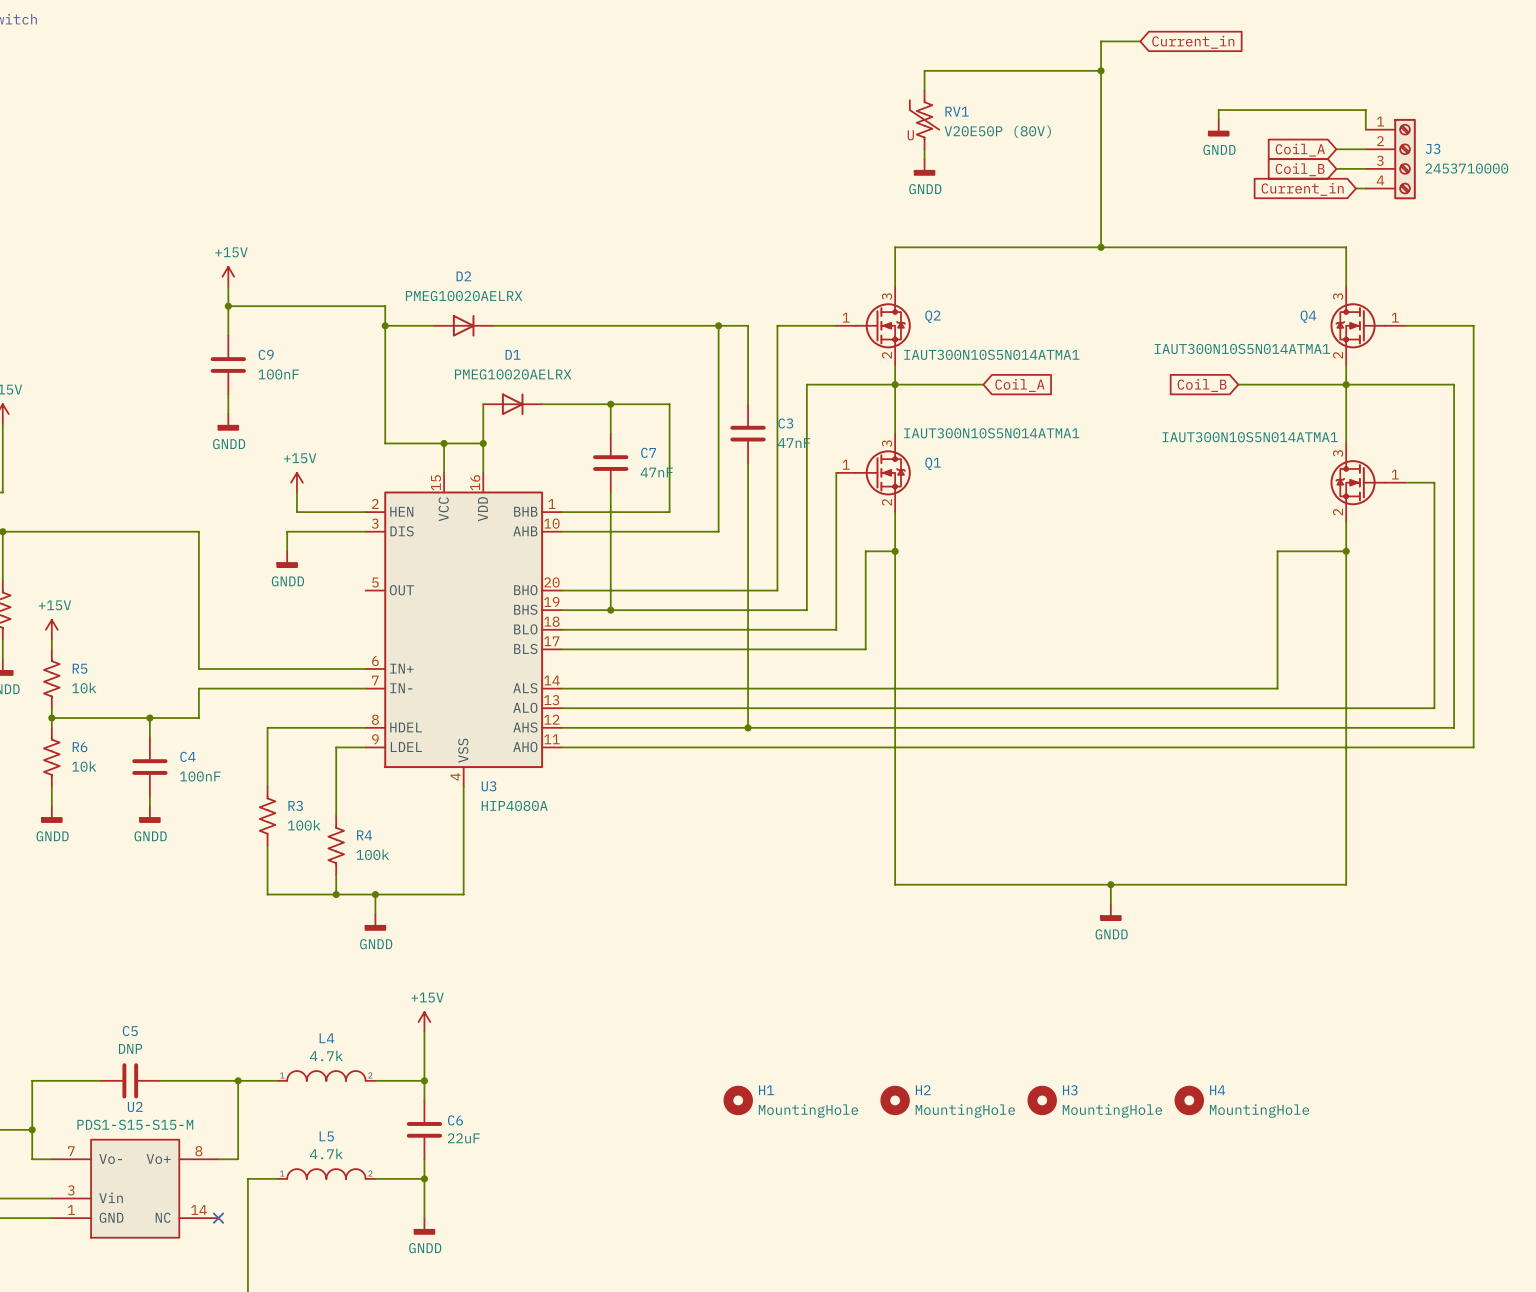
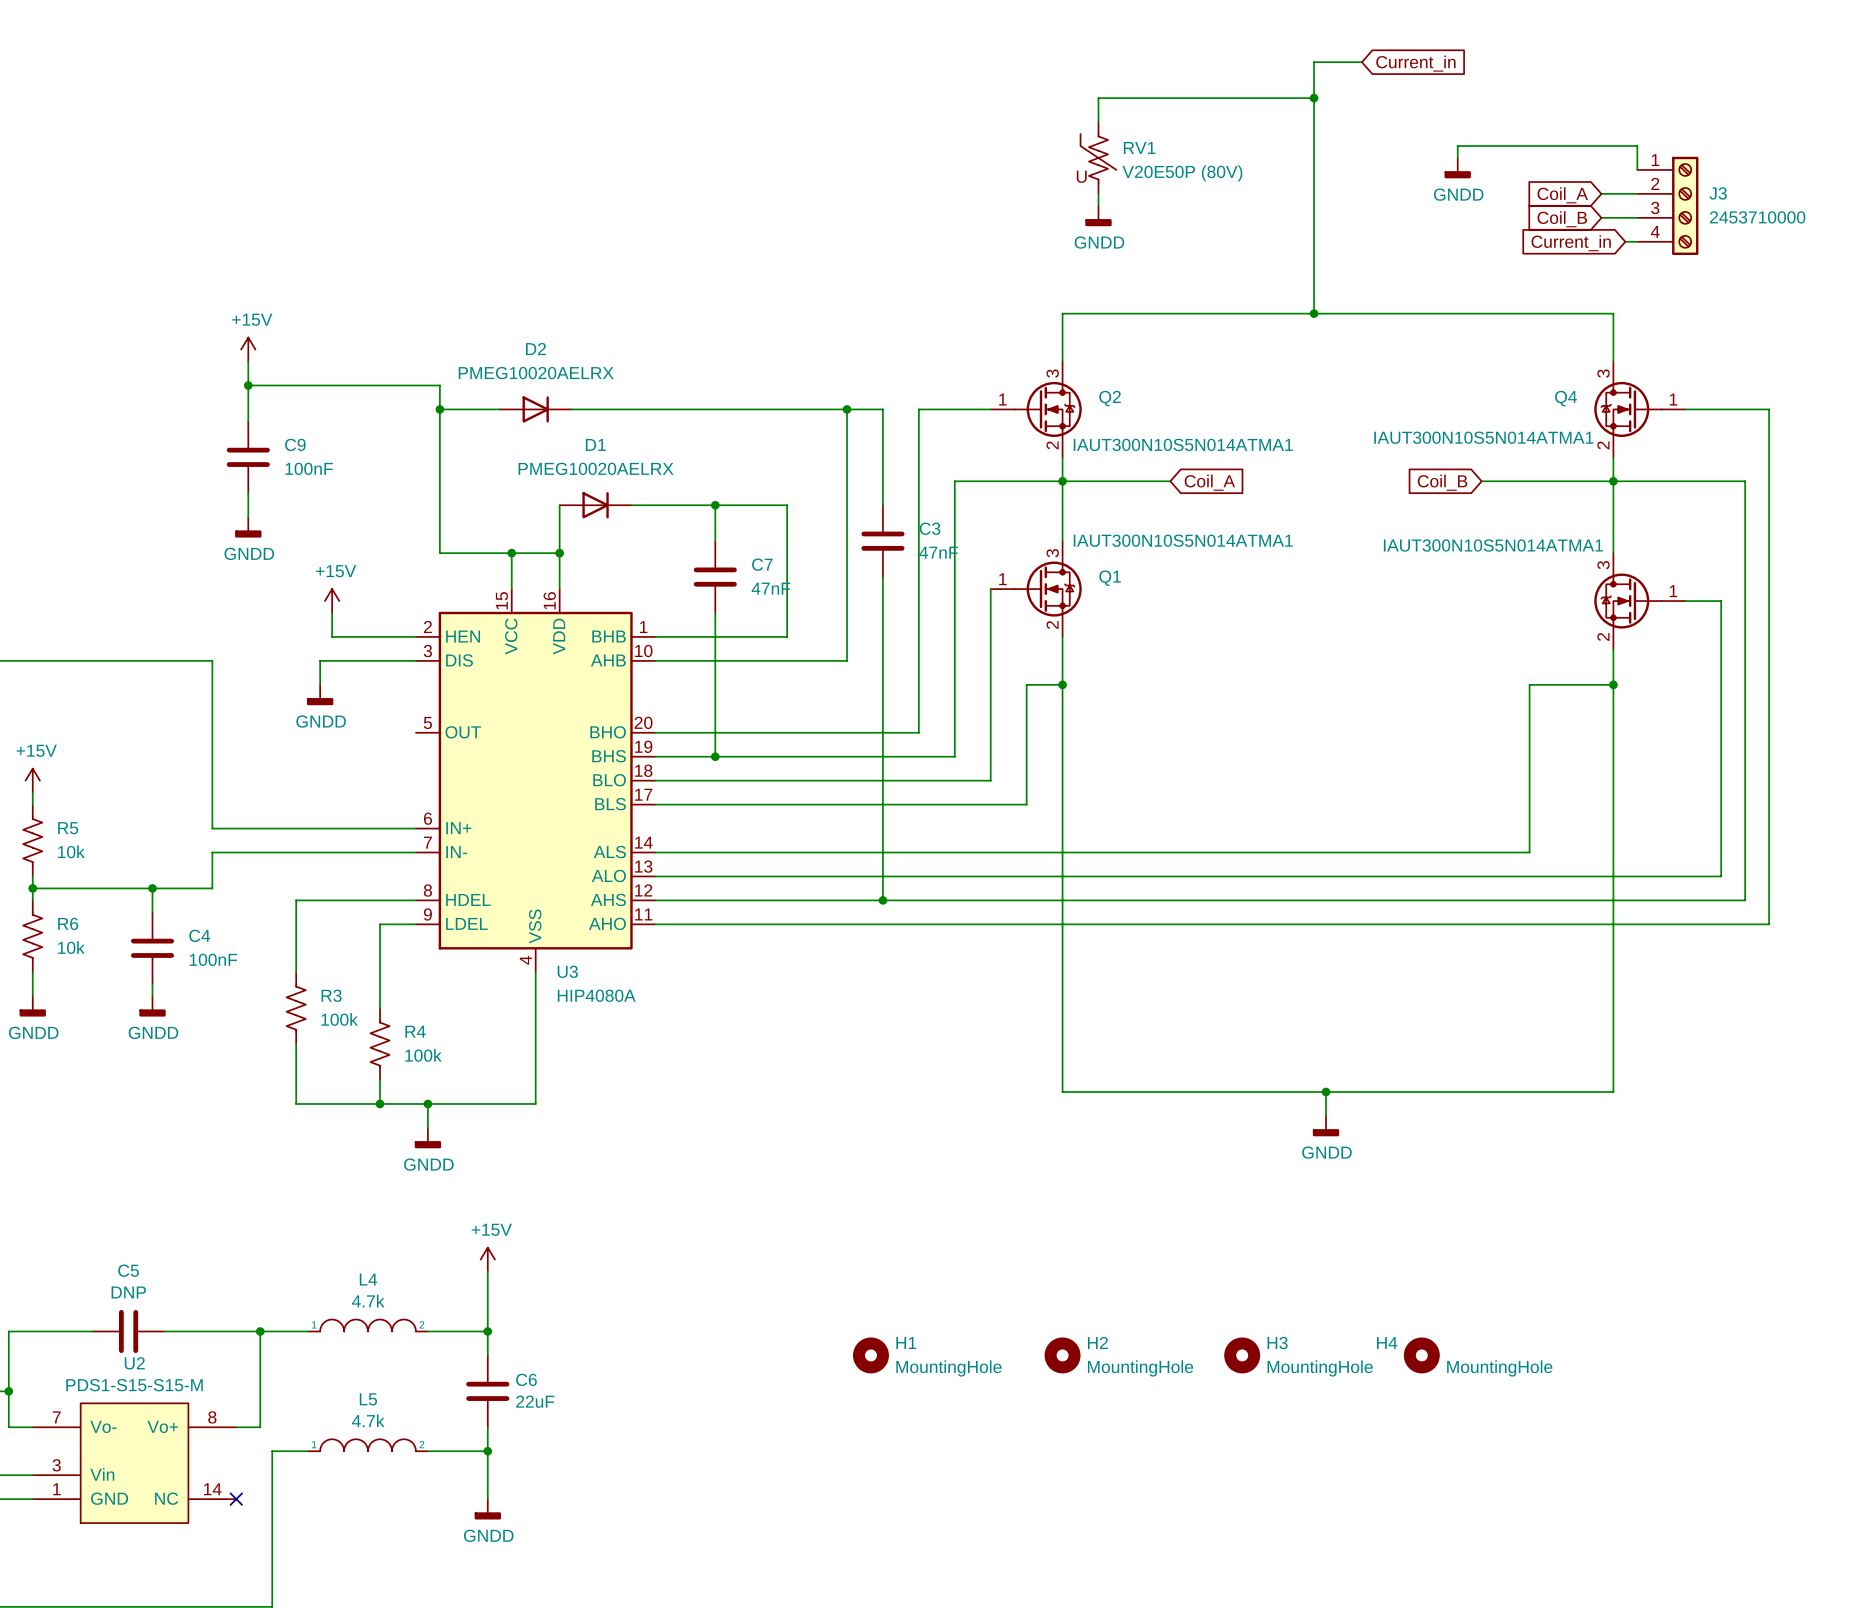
H4 name position: H4 (1217, 1090) -> H4 (1387, 1343)

